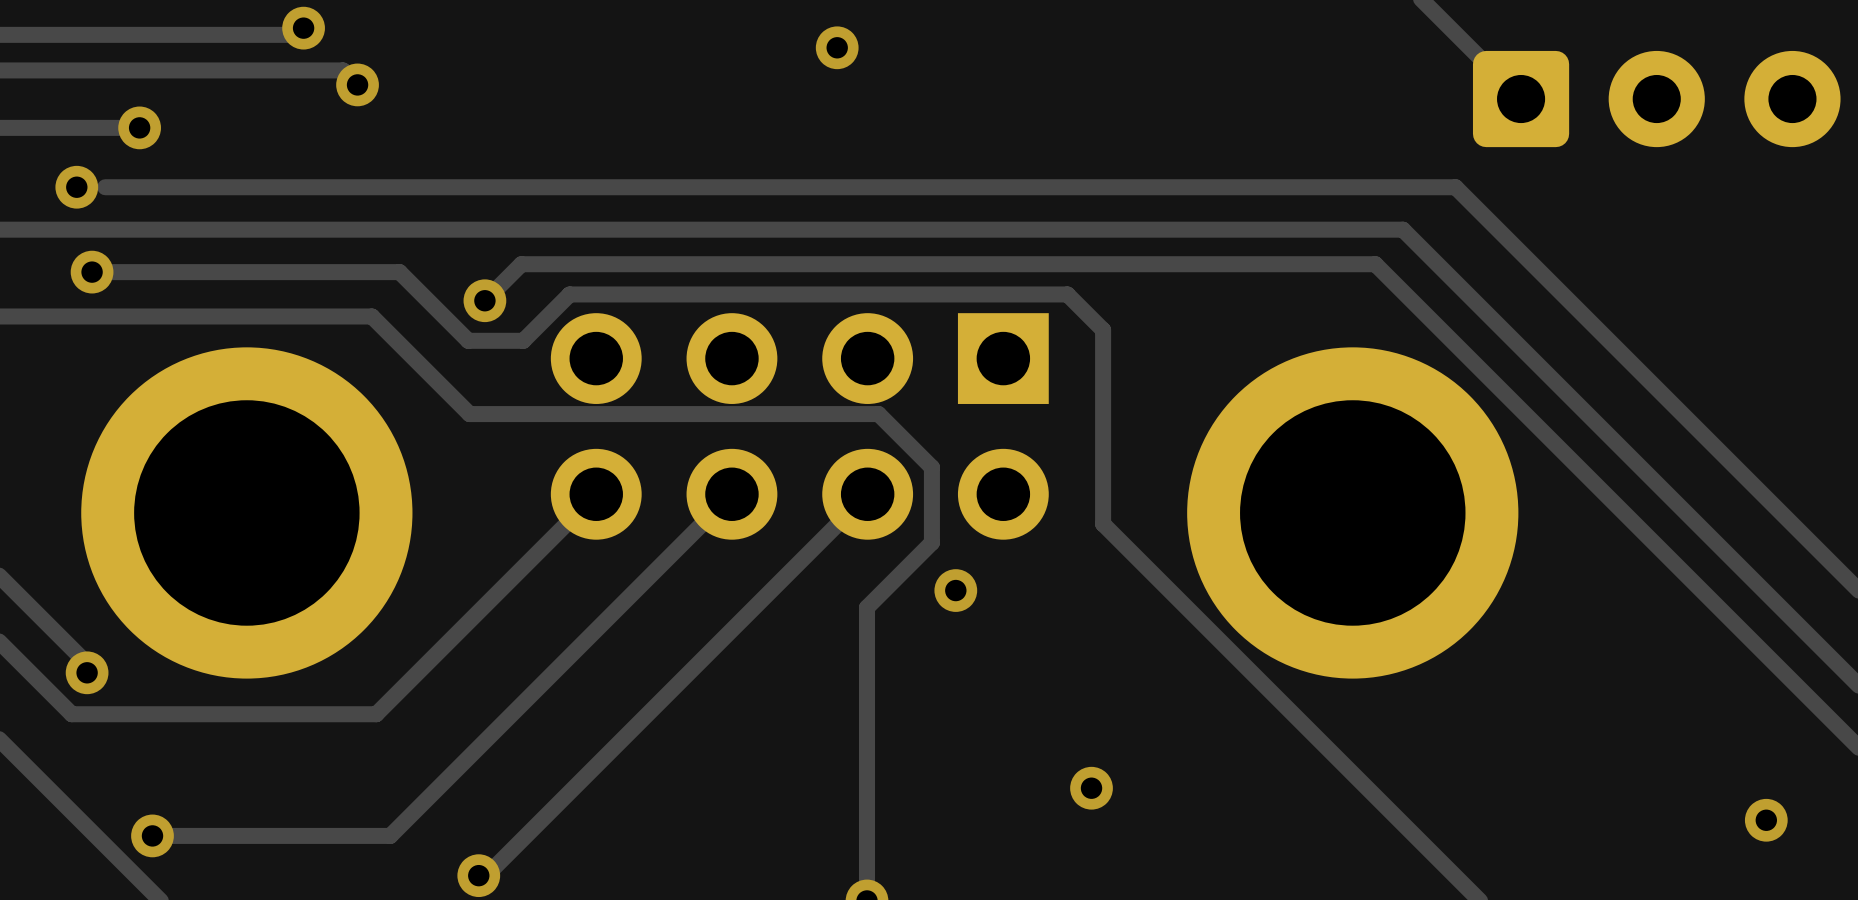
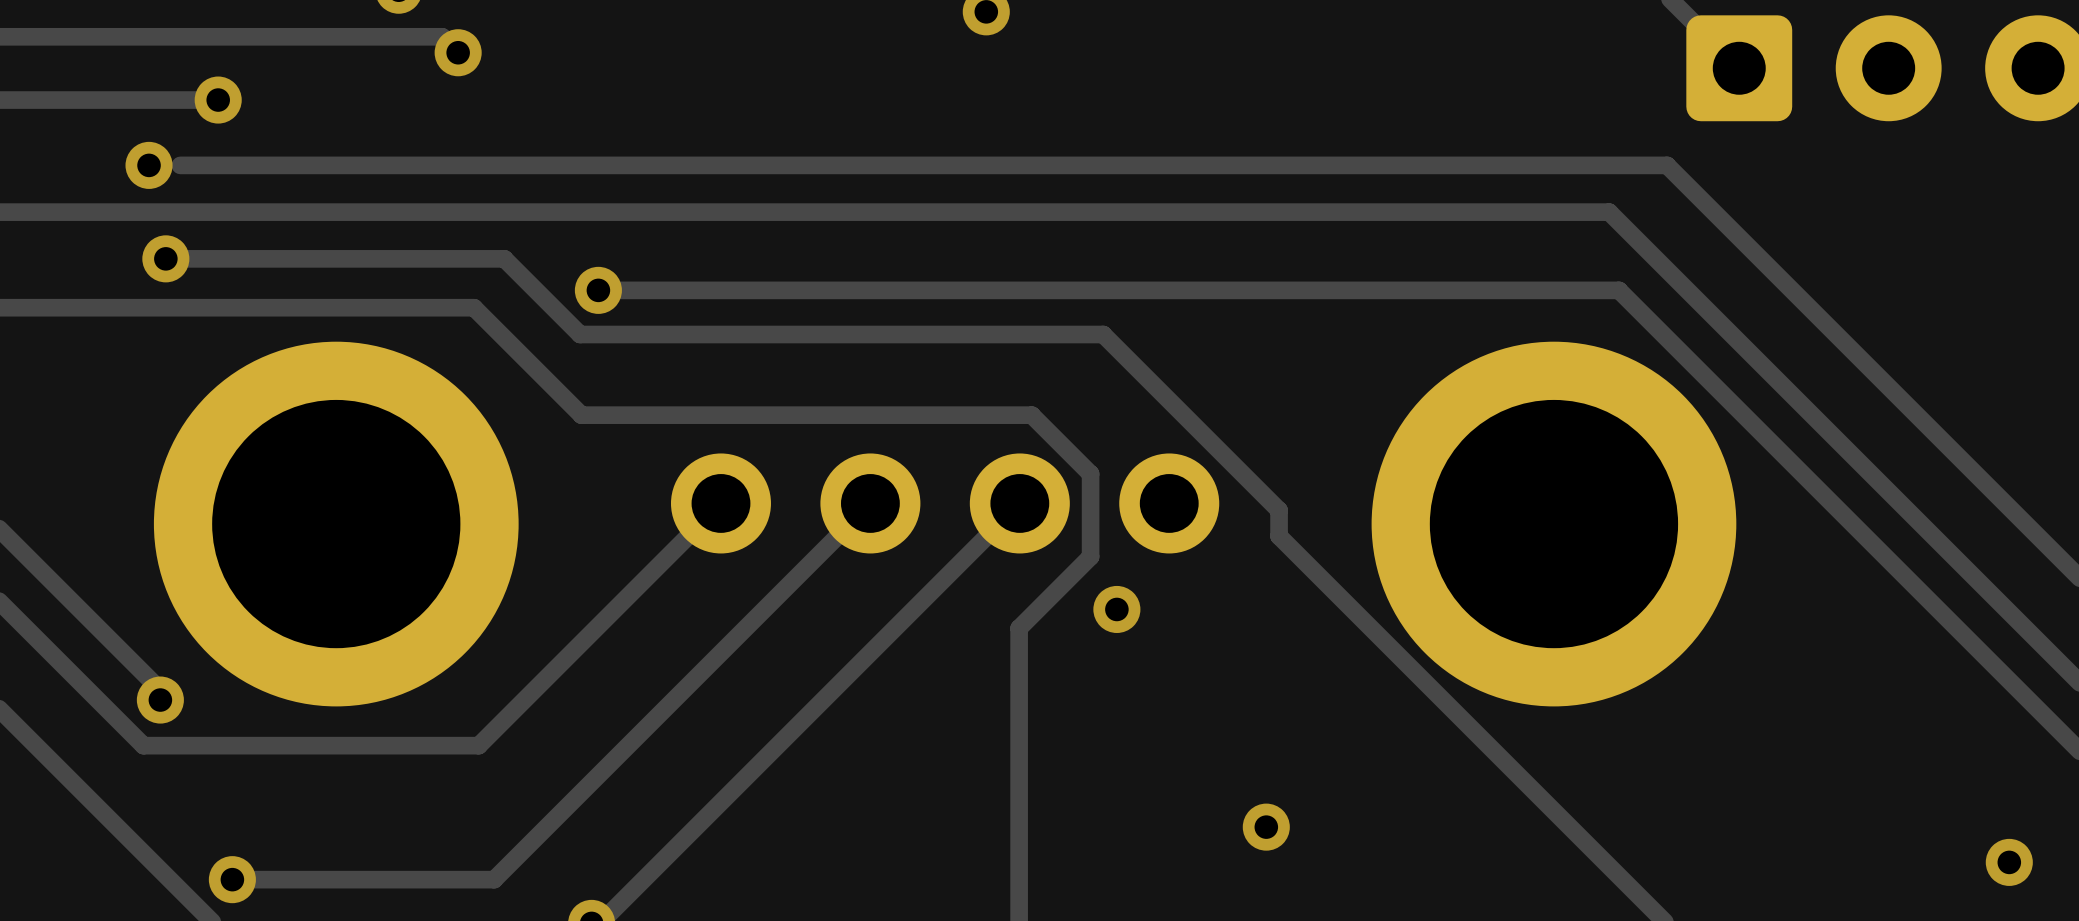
track: (1411, 300) (1375, 264) (521, 264) (484, 300) -> (1619, 290) (598, 290)
track: (523, 340) (569, 294) (1067, 294) (1103, 330) (1103, 500) -> (640, 334) (1103, 334) (1279, 510)
part: (799, 358) -> none

